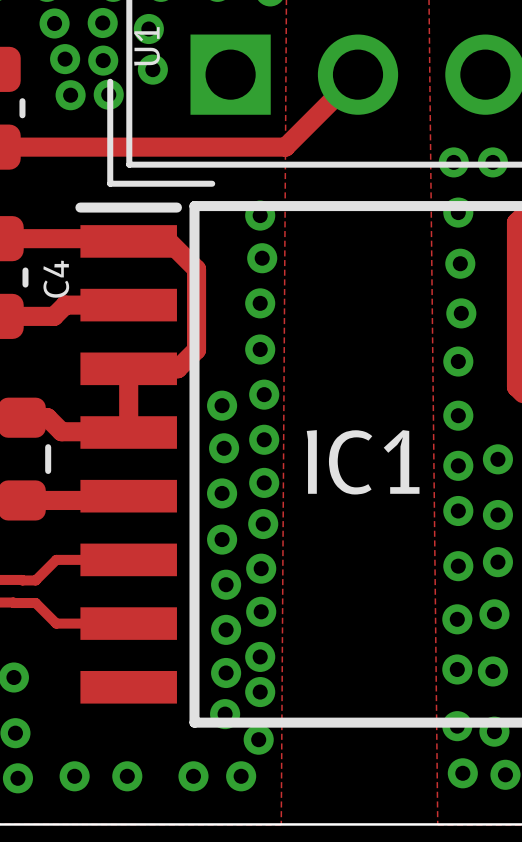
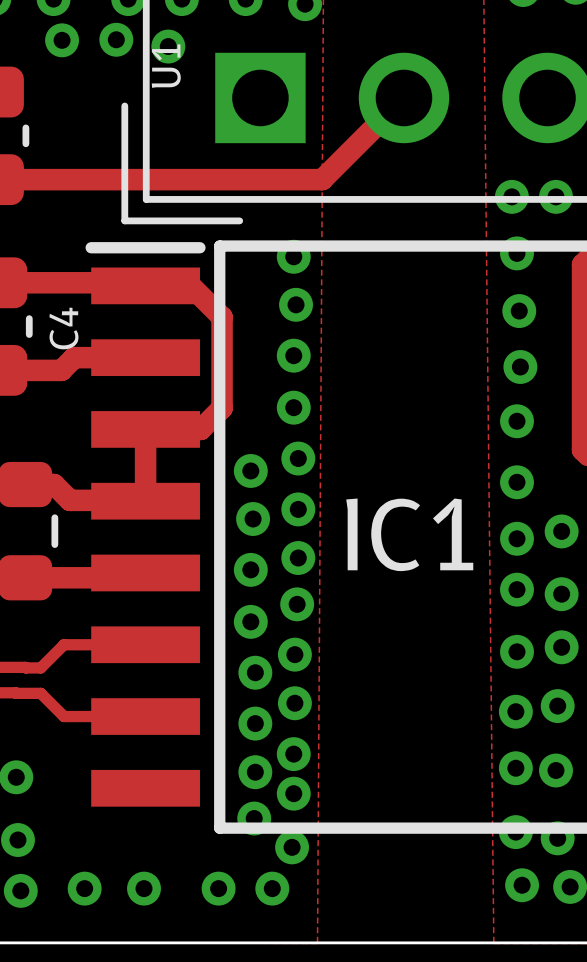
via: (65, 59) -> none
via: (103, 60) -> none
via: (152, 69) -> none
via: (108, 94) -> none
via: (70, 95) -> none

